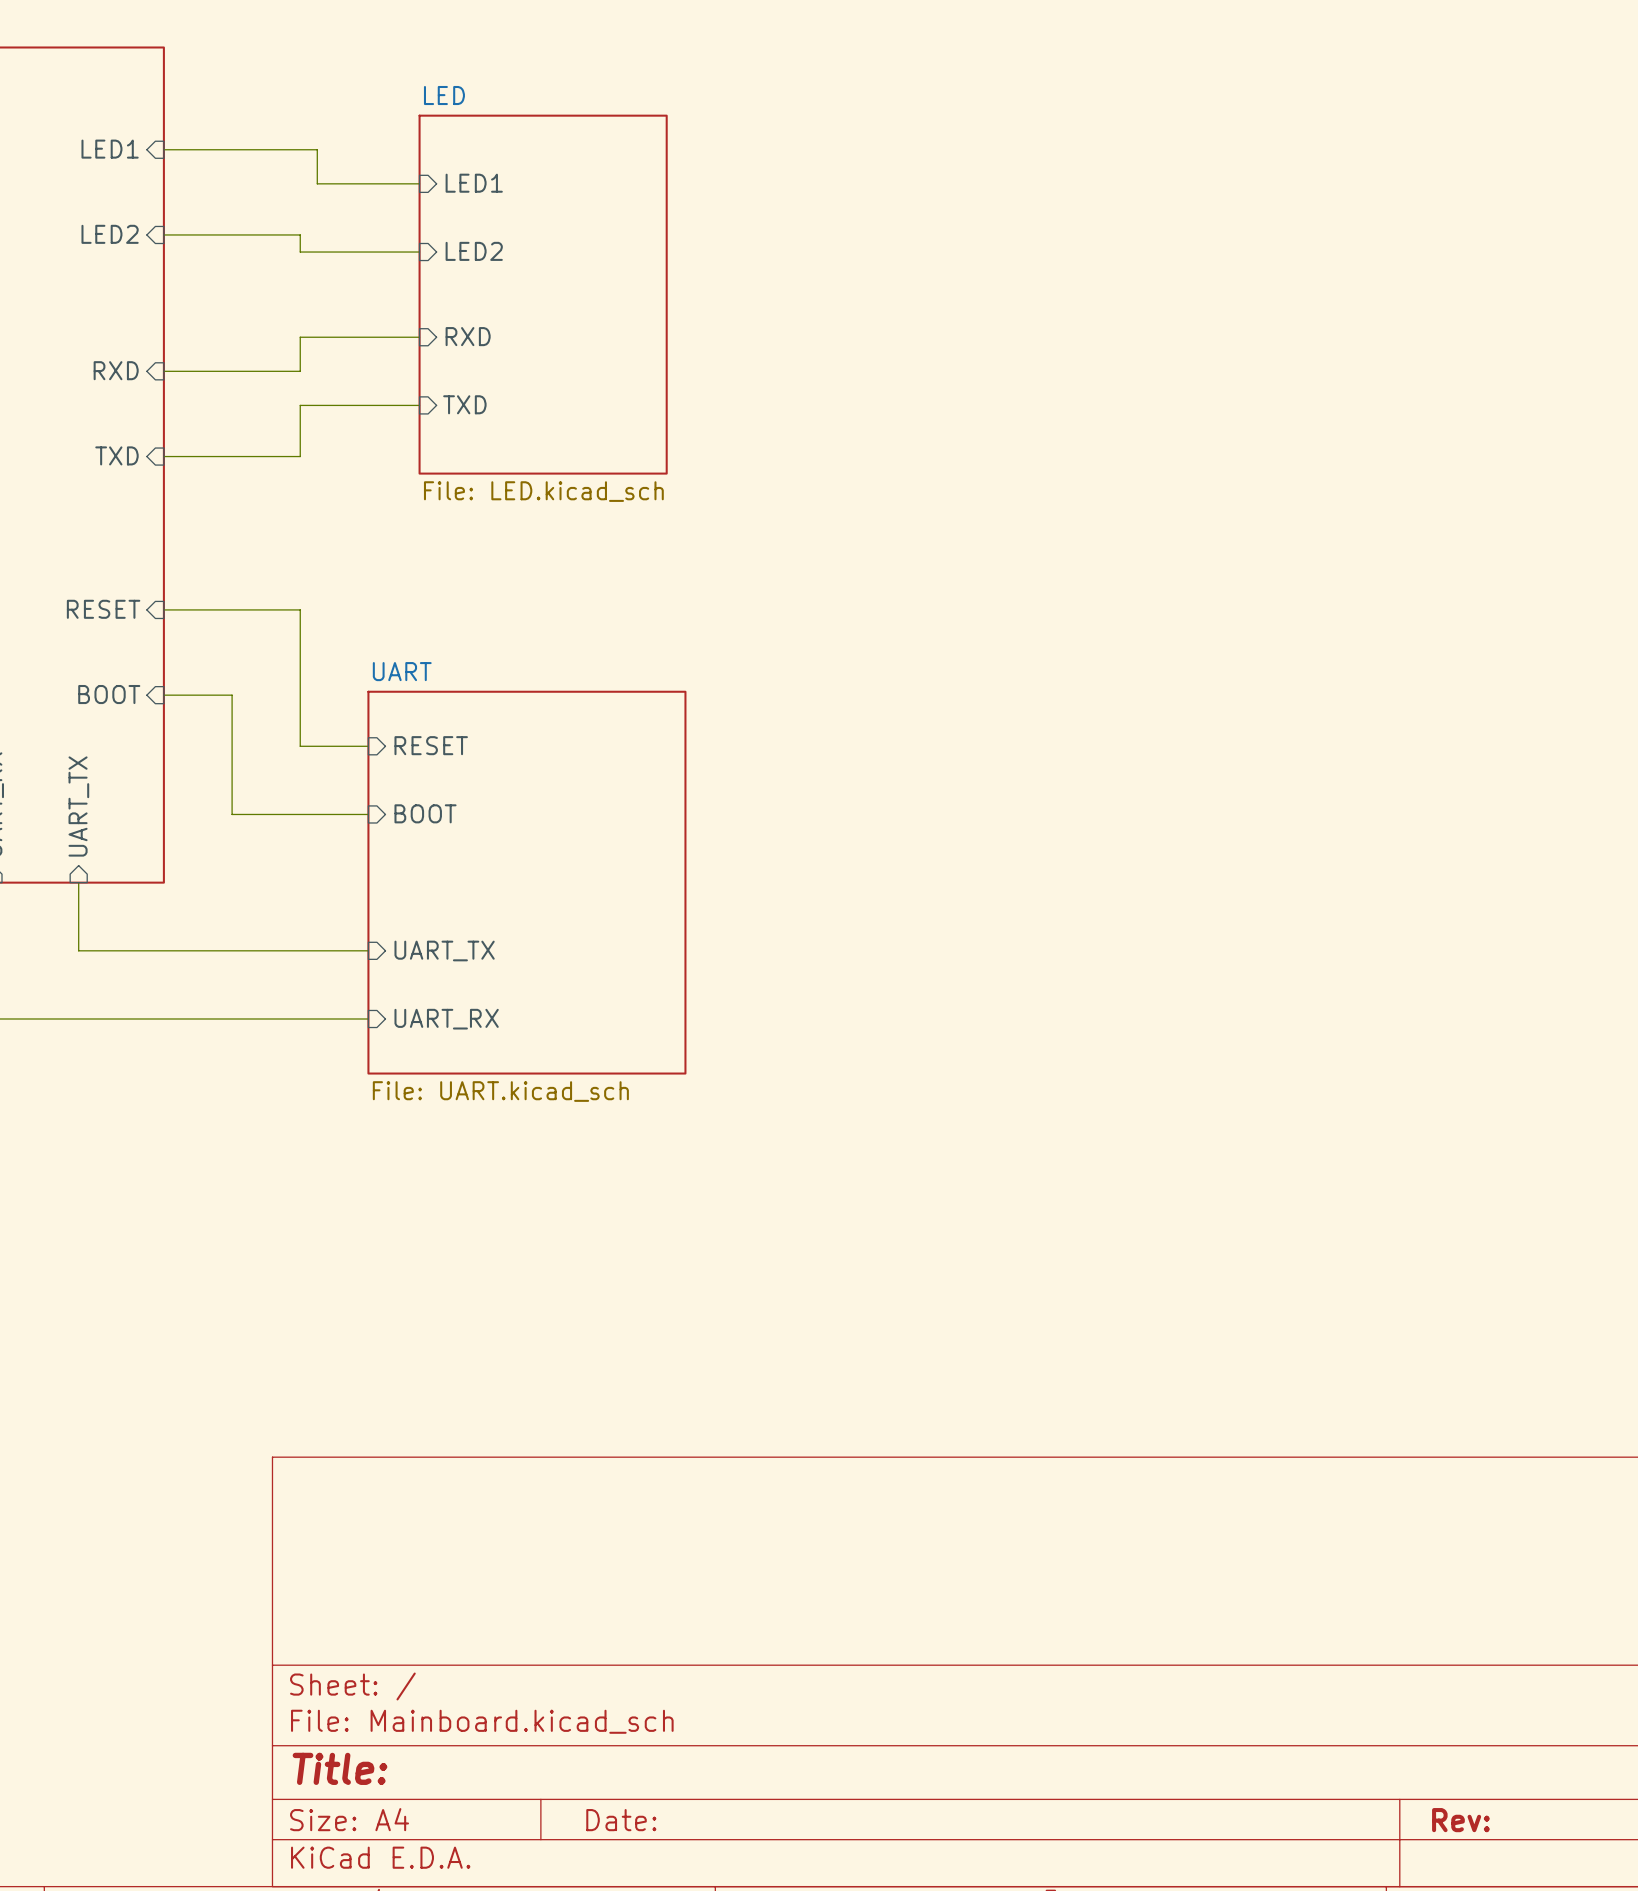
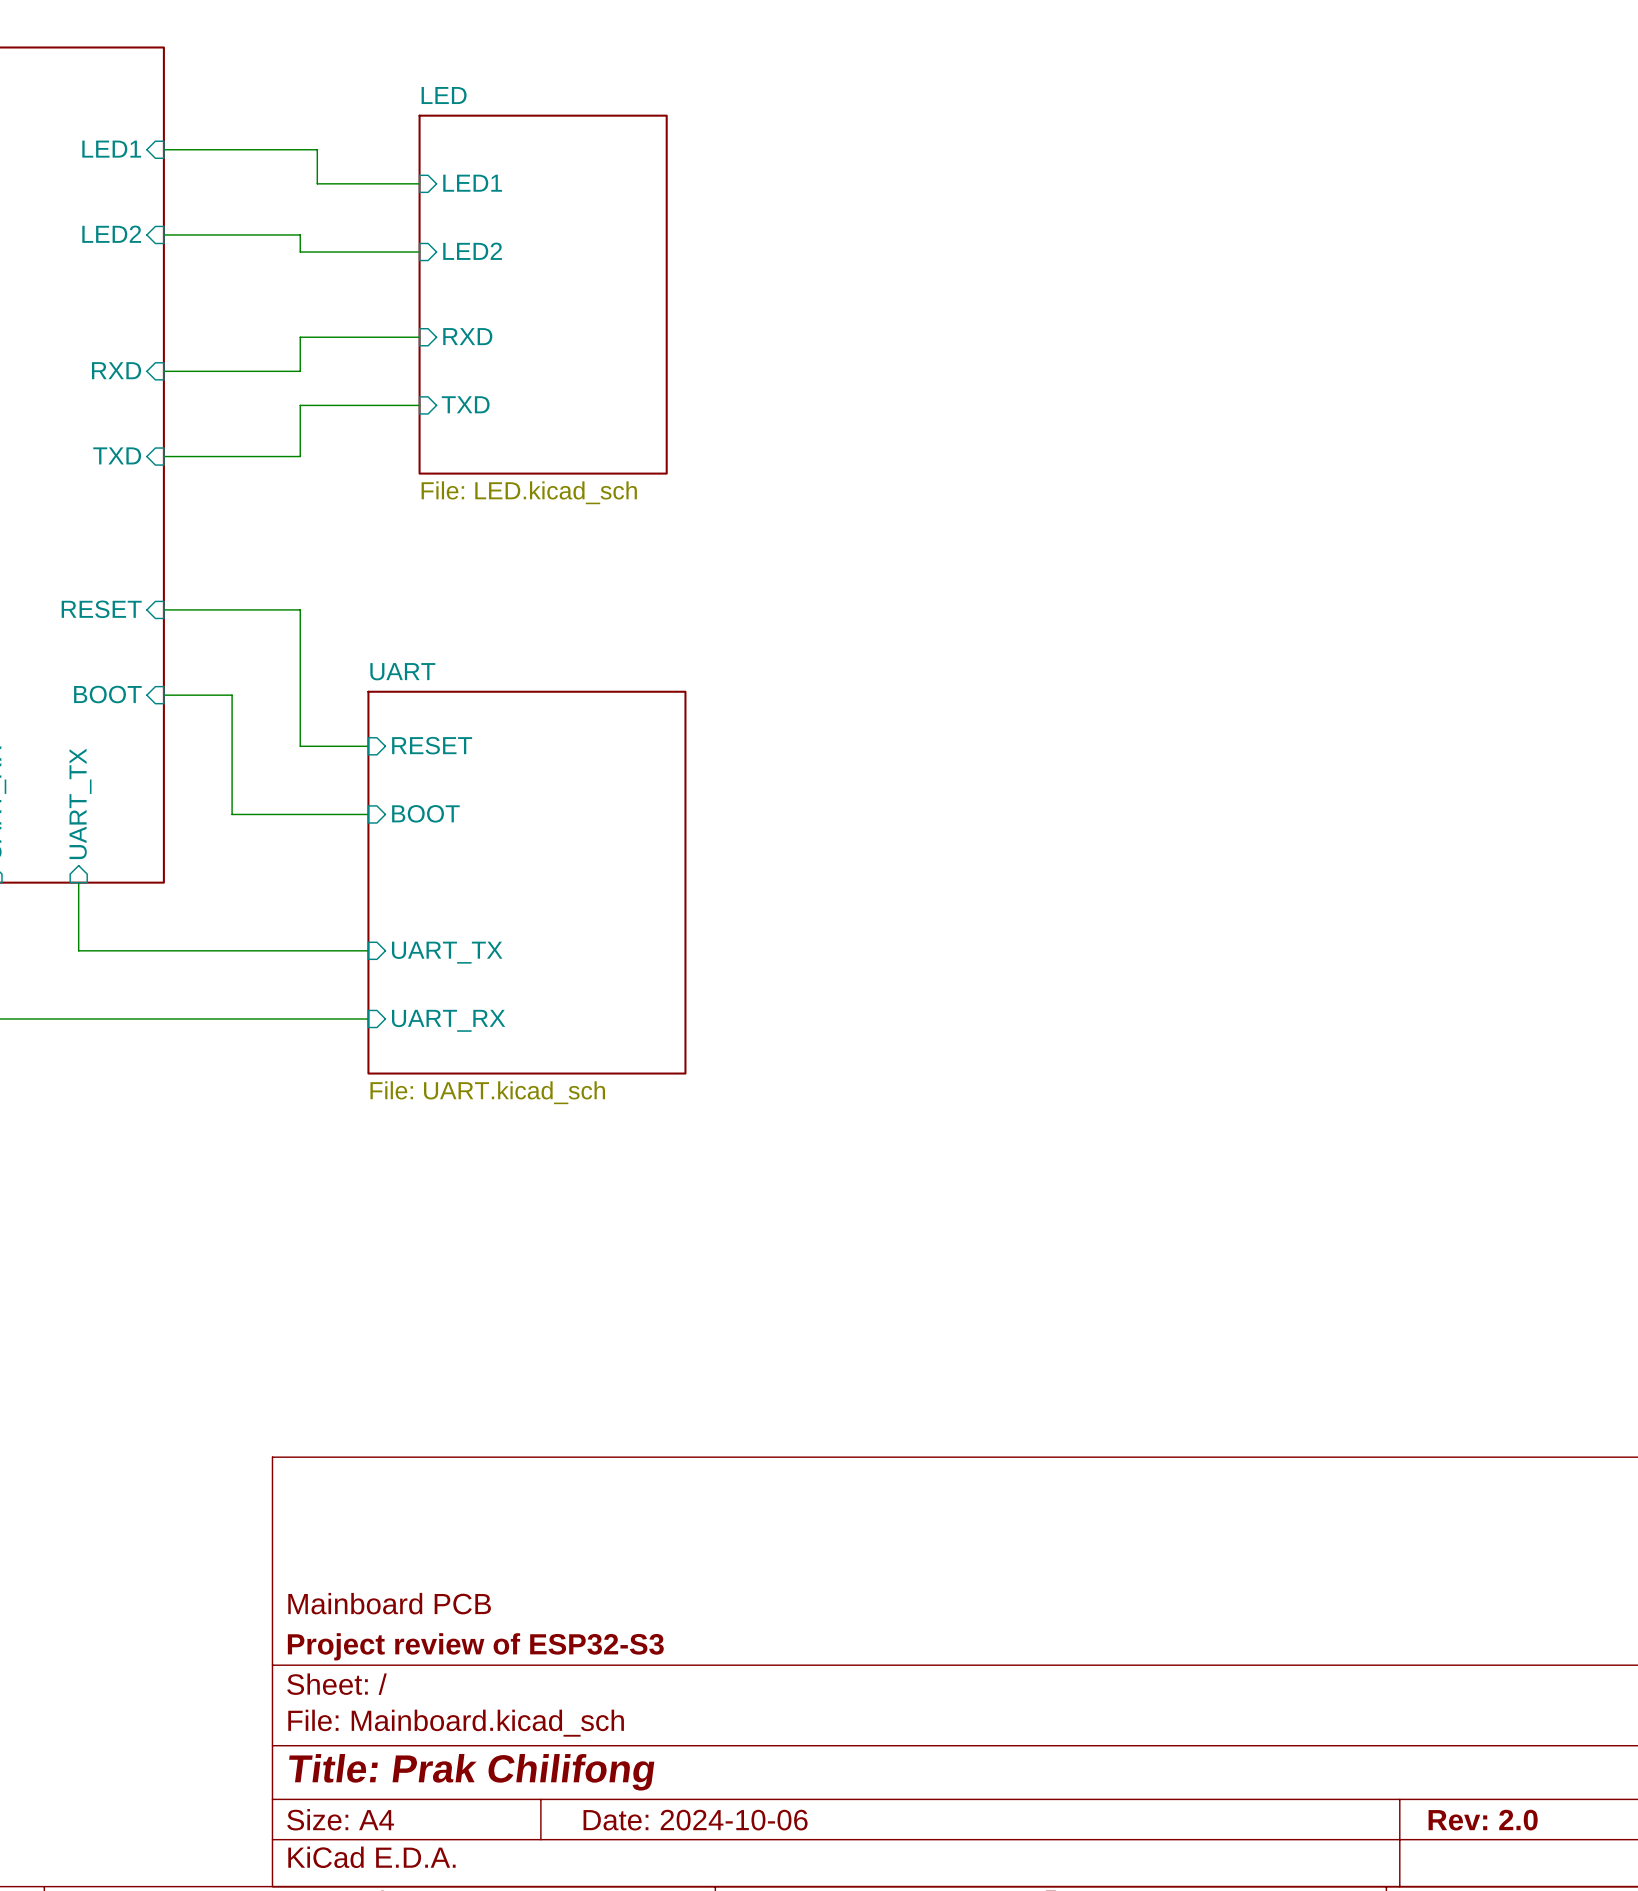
title block: none -> Mainboard PCB (389, 1603)
title block: none -> Project review of ESP32-S3 (475, 1646)
title block: Title: (339, 1768) -> Title: Prak Chilifong (471, 1772)
title block: Date: (621, 1820) -> Date: 2024-10-06 (695, 1820)
title block: Rev: (1460, 1820) -> Rev: 2.0 (1483, 1820)

